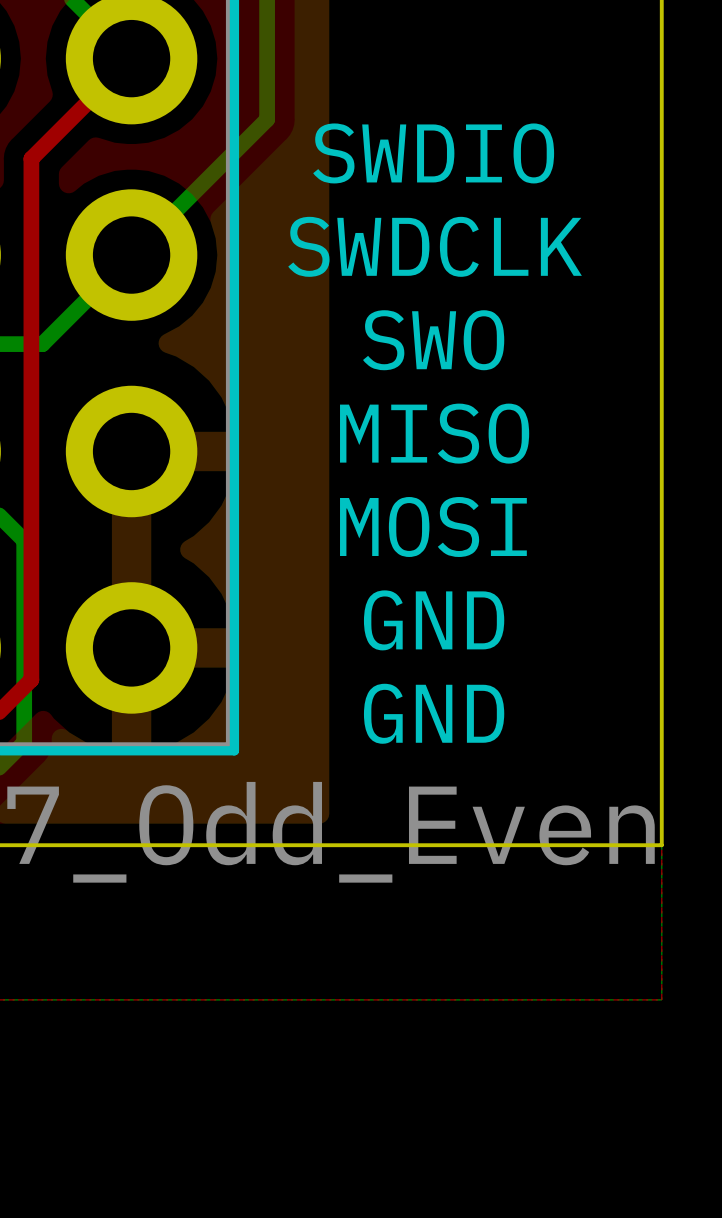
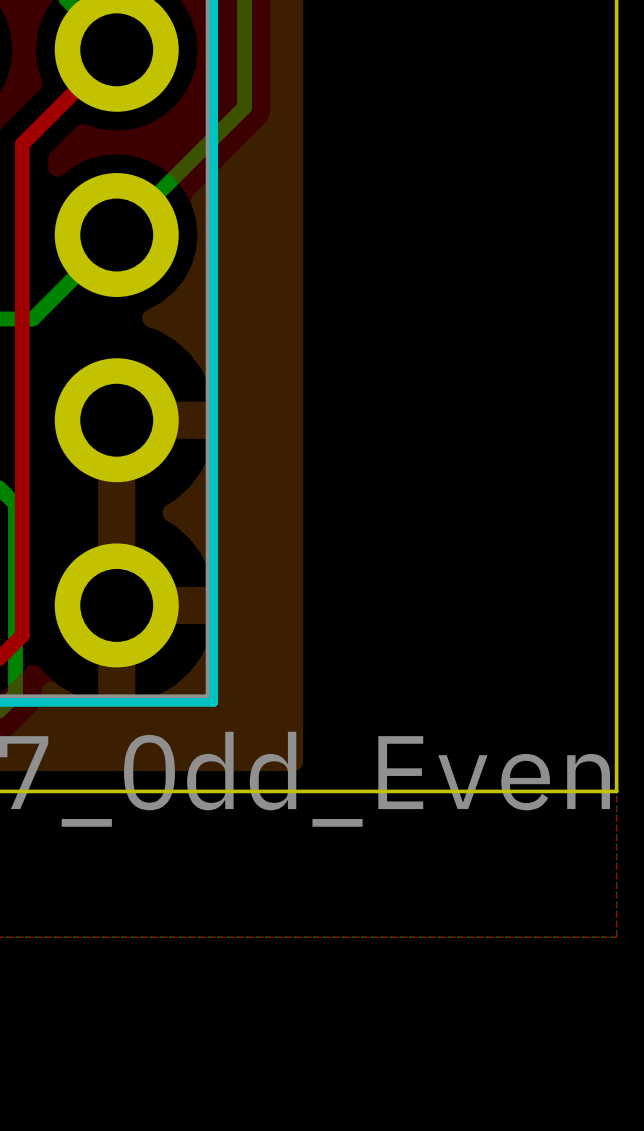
text: SWDIO (433, 153) -> none
text: SWDCLK (435, 246) -> none
text: SWO (433, 340) -> none
text: MISO (434, 433) -> none
text: MOSI (433, 527) -> none
text: GND (434, 620) -> none
text: GND (434, 713) -> none

